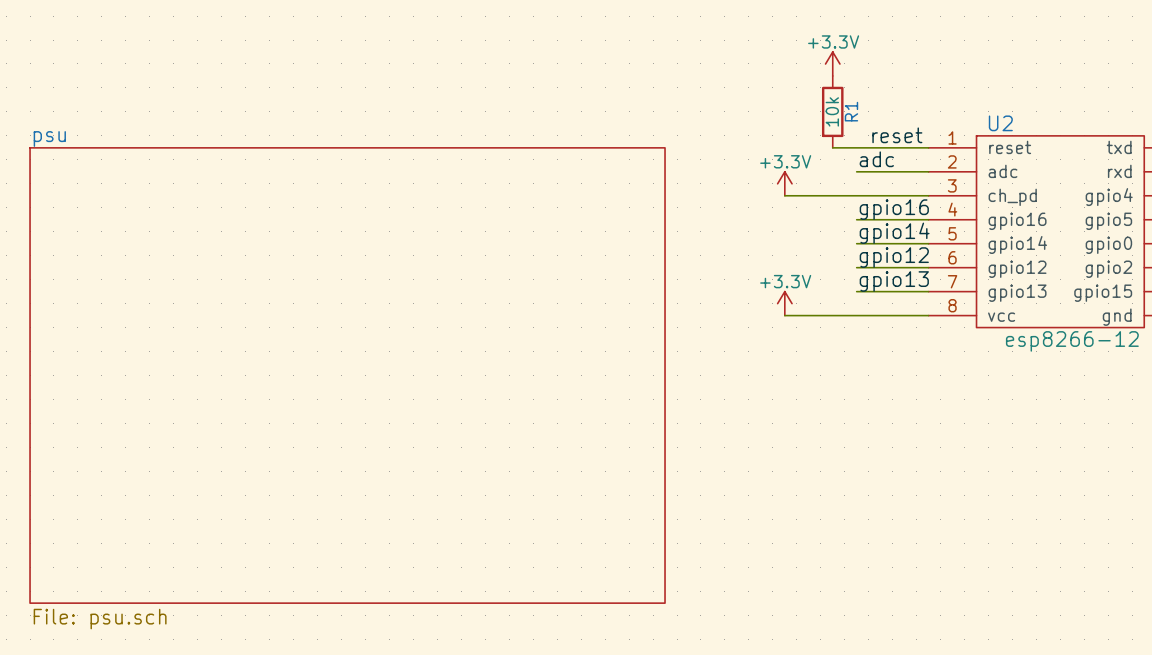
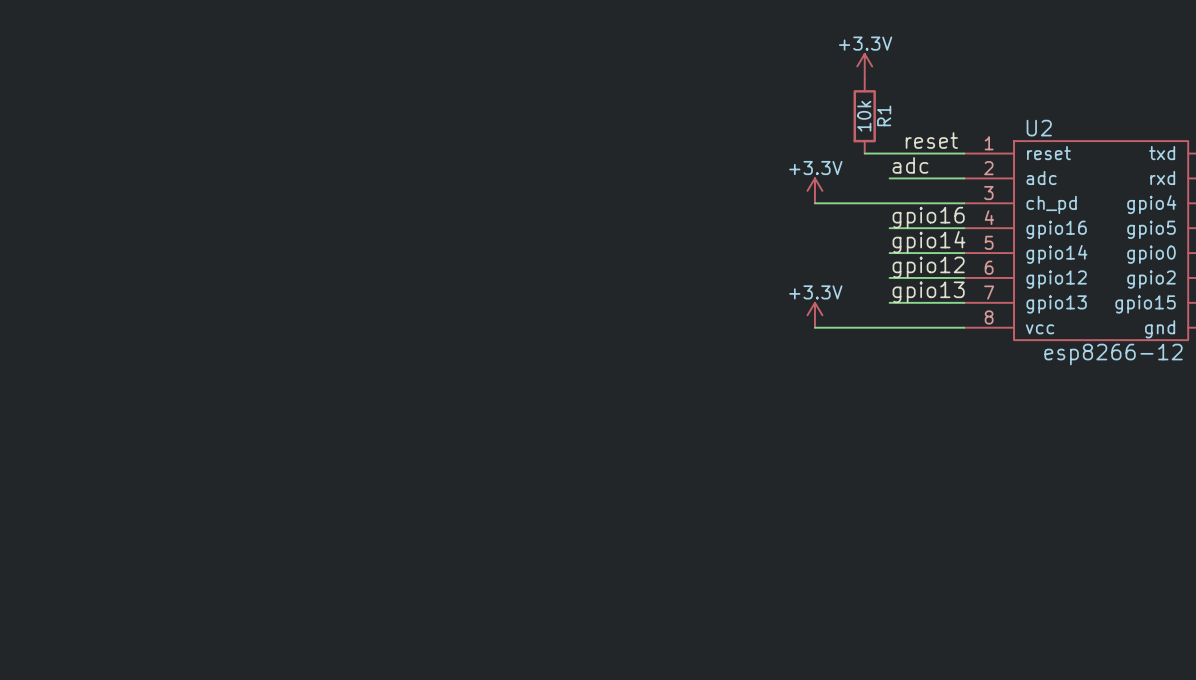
sheet psu: File: psu.sch (347, 375) -> none

